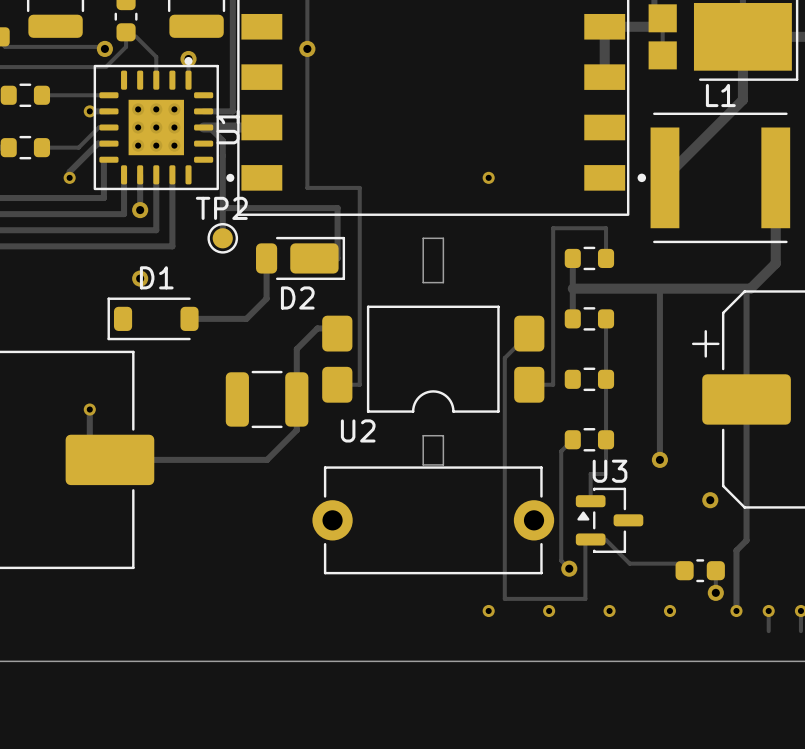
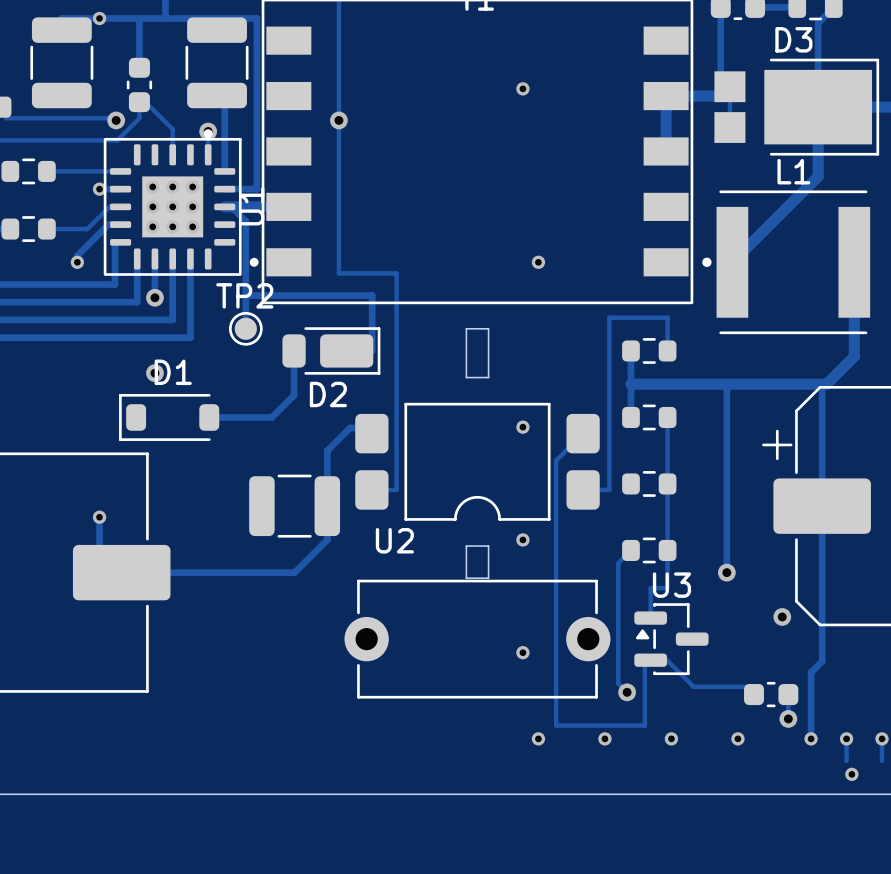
via: none -> (522, 88)
track: none -> (217, 95) (224, 95) (224, 171)
via: none -> (522, 427)
via: none -> (522, 539)
via: none -> (522, 652)
via: none -> (851, 774)

